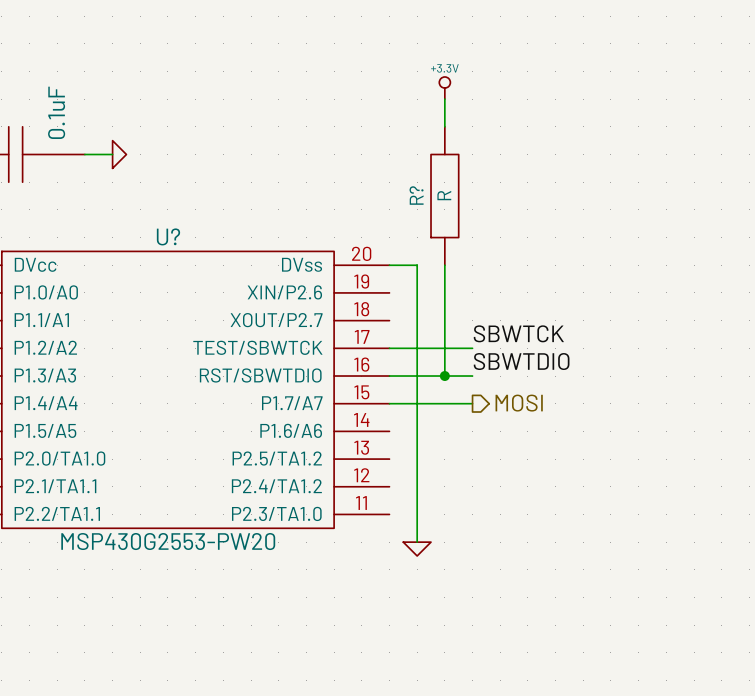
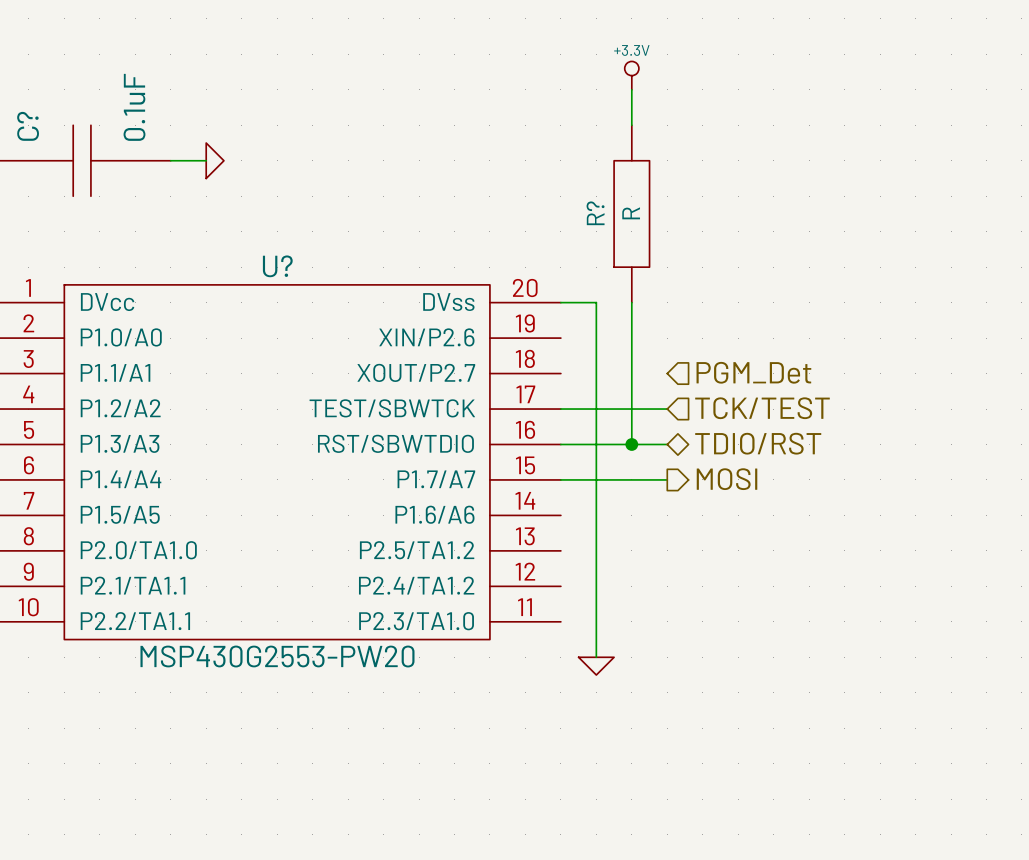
hierarchical label: none -> PGM_Det (753, 372)
label: SBWTCK (518, 333) -> none
hierarchical label: none -> TCK/TEST (762, 408)
label: SBWTDIO (521, 361) -> none
hierarchical label: none -> TDIO/RST (758, 443)

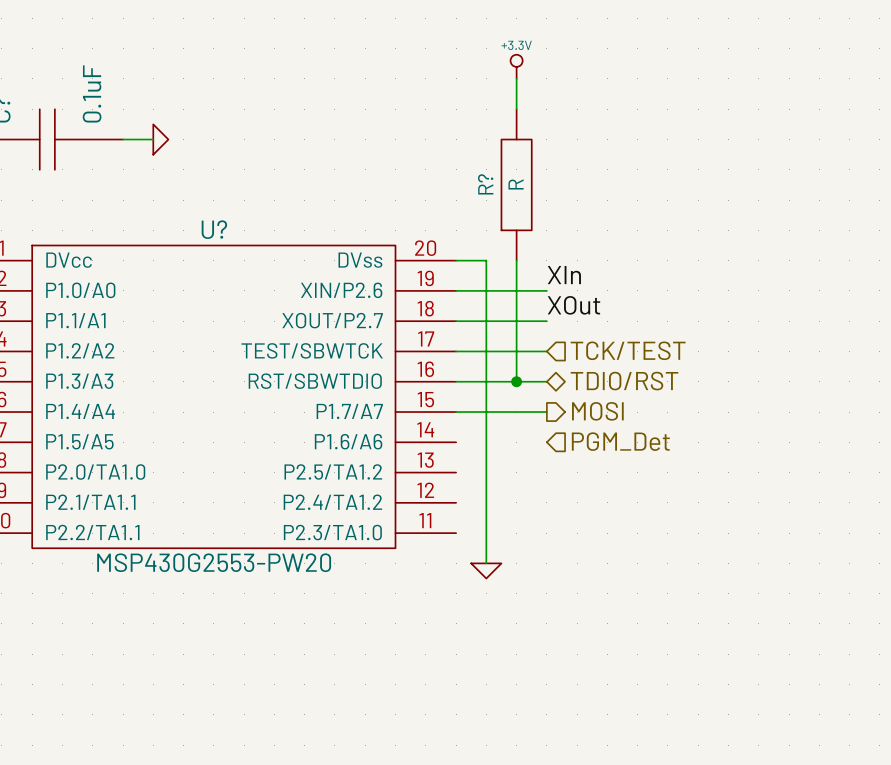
label: none -> XIn (564, 275)
wire: none -> (456, 290) (546, 290)
label: none -> XOut (574, 305)
hierarchical label position: PGM_Det (753, 372) -> PGM_Det (620, 441)
wire: none -> (456, 321) (546, 321)

